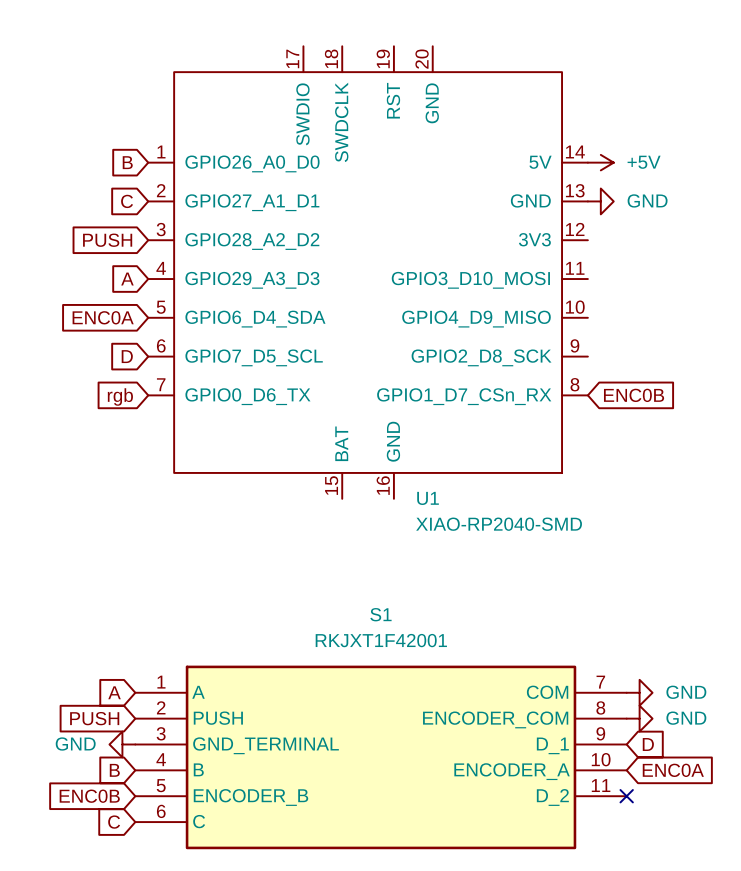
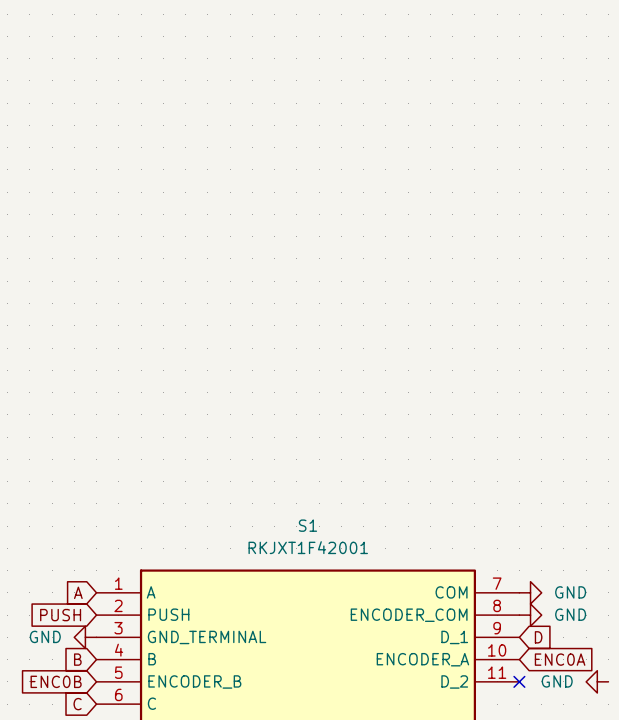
global label: B (127, 162) -> none
power symbol: +5V (600, 162) -> none
global label: C (127, 201) -> none
power symbol: GND (600, 201) -> none
global label: PUSH (107, 240) -> none
U1: XIAO-RP2040-SMD (368, 272) -> none
global label: A (127, 279) -> none
global label: ENC0A (103, 317) -> none
global label: D (127, 356) -> none
global label: ENC0B (634, 395) -> none
global label: rgb (120, 396) -> none
power symbol: none -> GND (597, 681)

